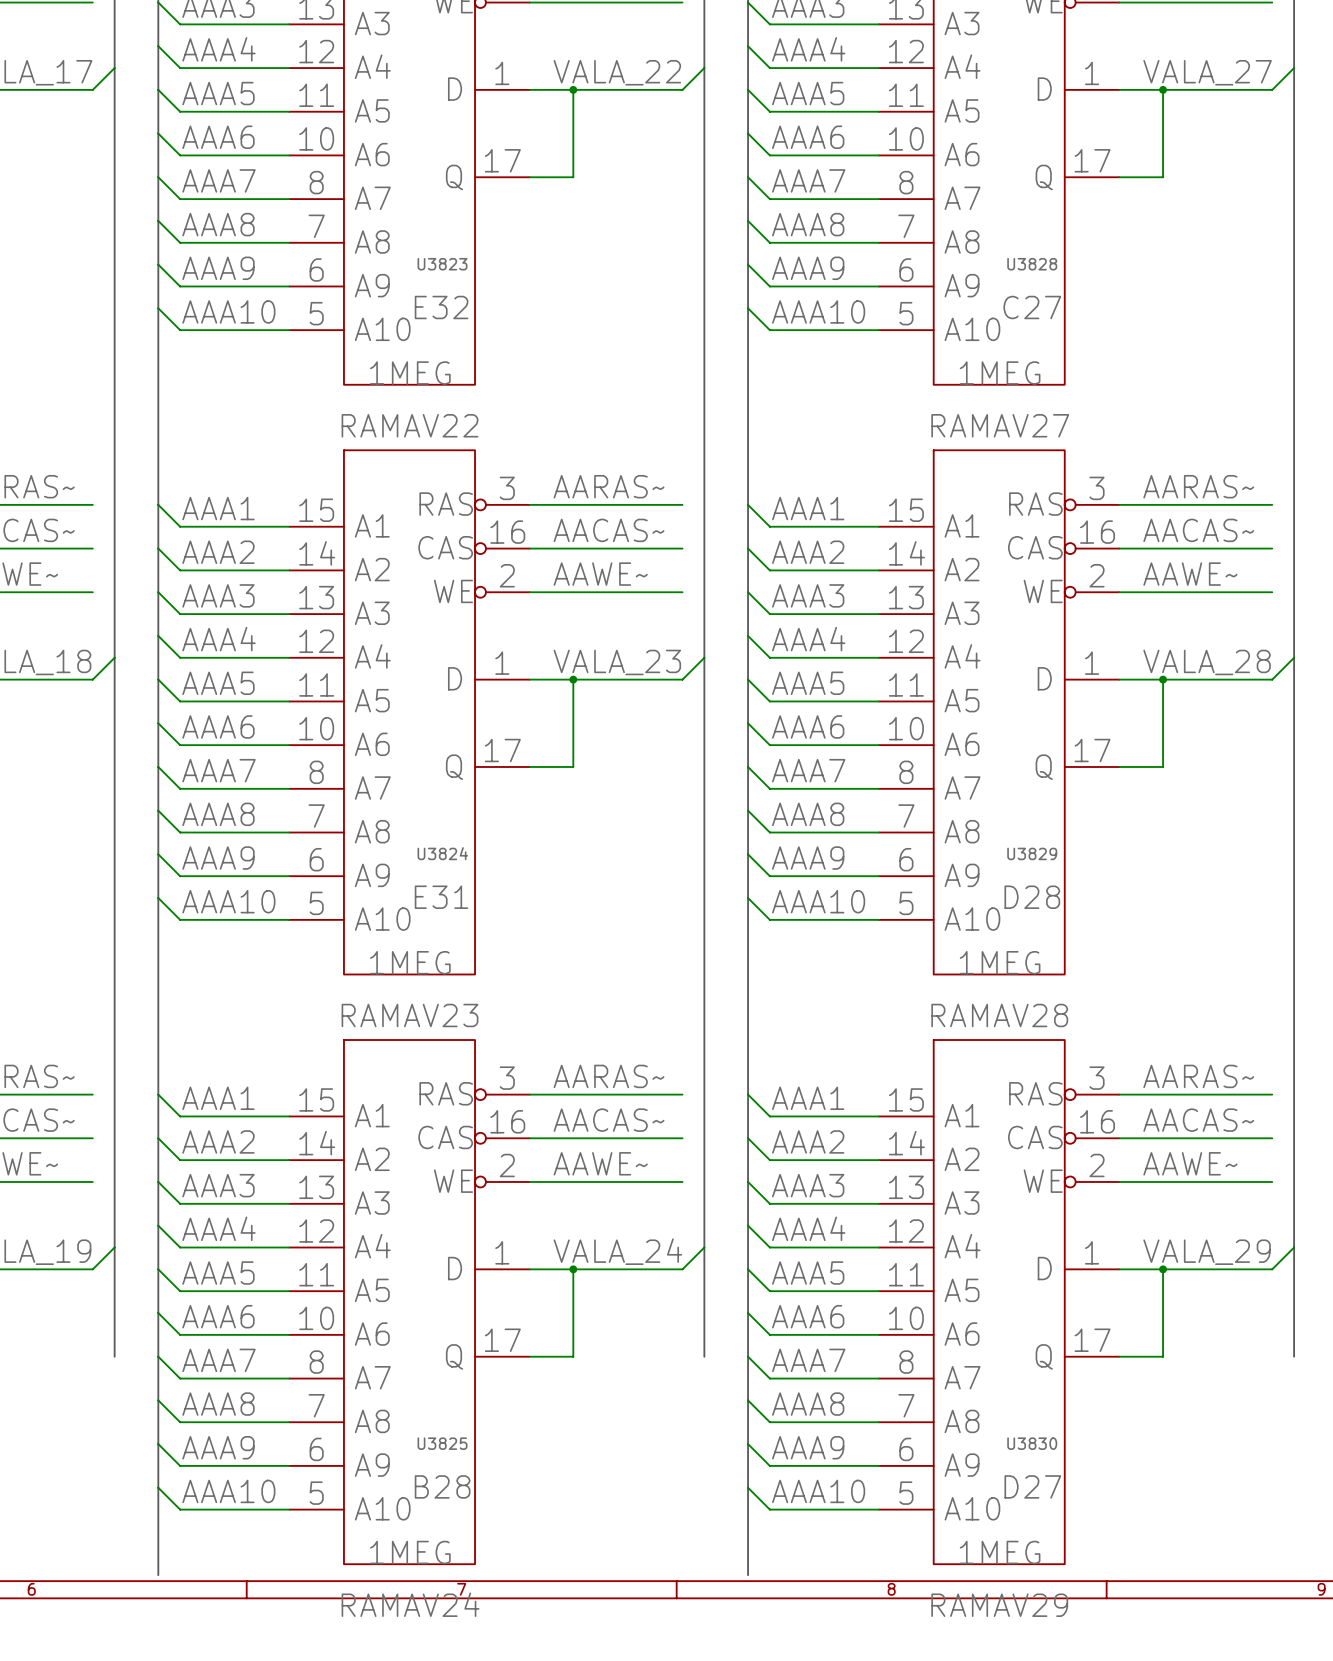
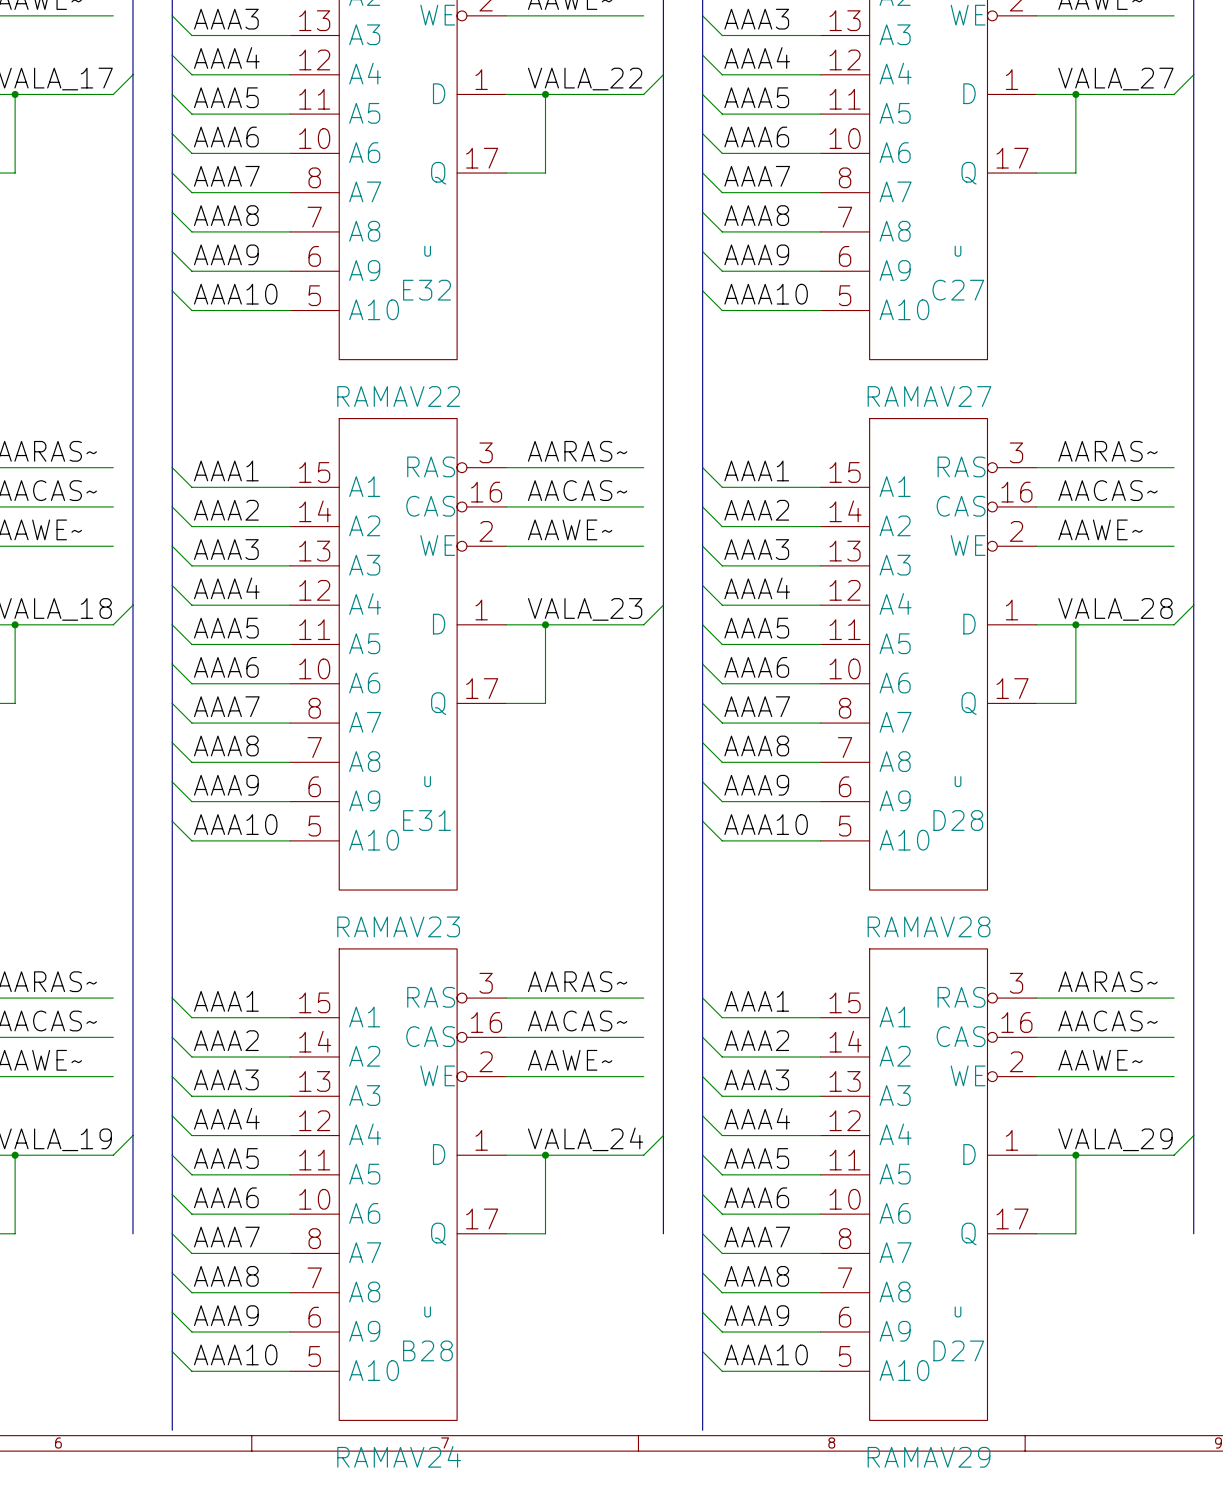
U3823 name: U3823 (442, 264) -> U (427, 251)
U3828 name: U3828 (1032, 264) -> U (958, 251)
U3823 value: 1MEG (410, 373) -> none
U3828 value: 1MEG (1000, 373) -> none
U3824 name: U3824 (442, 853) -> U (427, 781)
U3829 name: U3829 (1032, 853) -> U (958, 781)
U3824 value: 1MEG (410, 962) -> none
U3829 value: 1MEG (1000, 962) -> none
U3825 name: U3825 (442, 1443) -> U (427, 1311)
U3830 name: U3830 (1032, 1443) -> U (958, 1311)
U3825 value: 1MEG (410, 1552) -> none
U3830 value: 1MEG (1000, 1552) -> none

